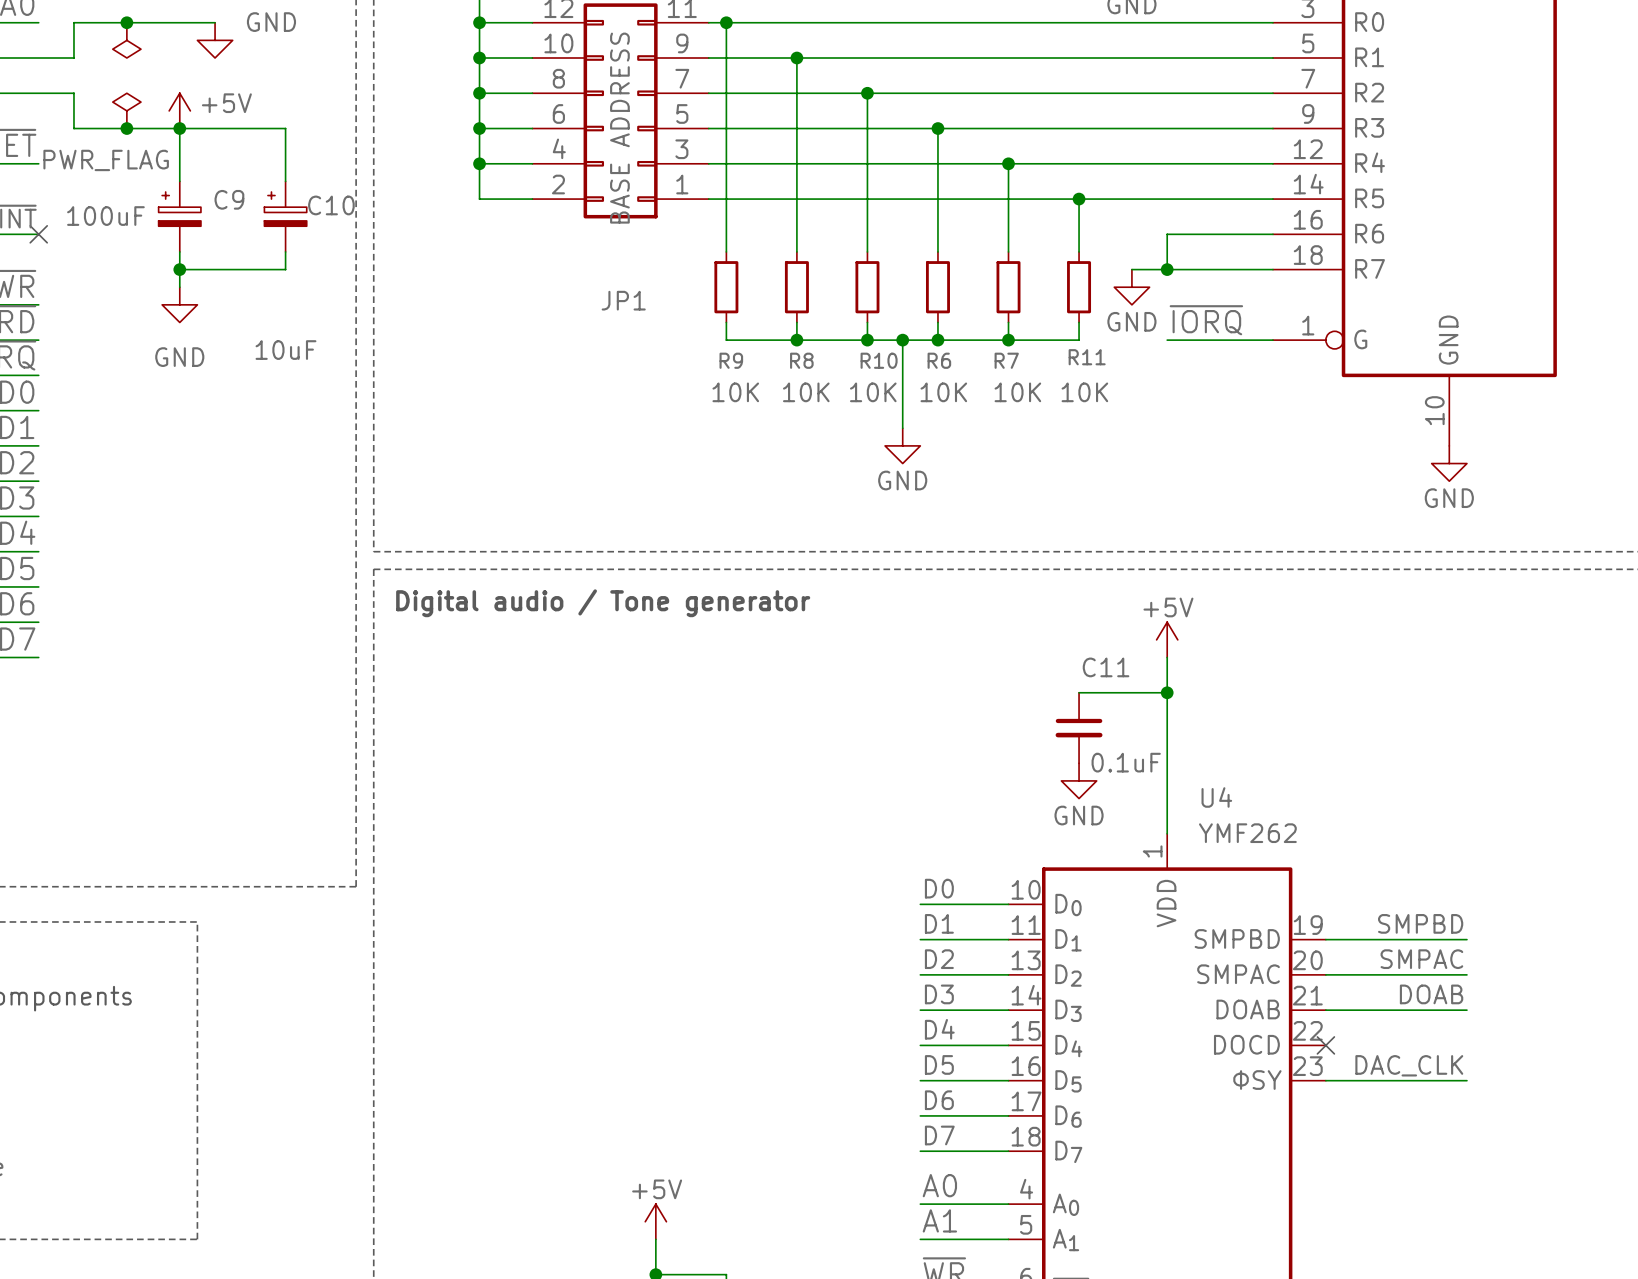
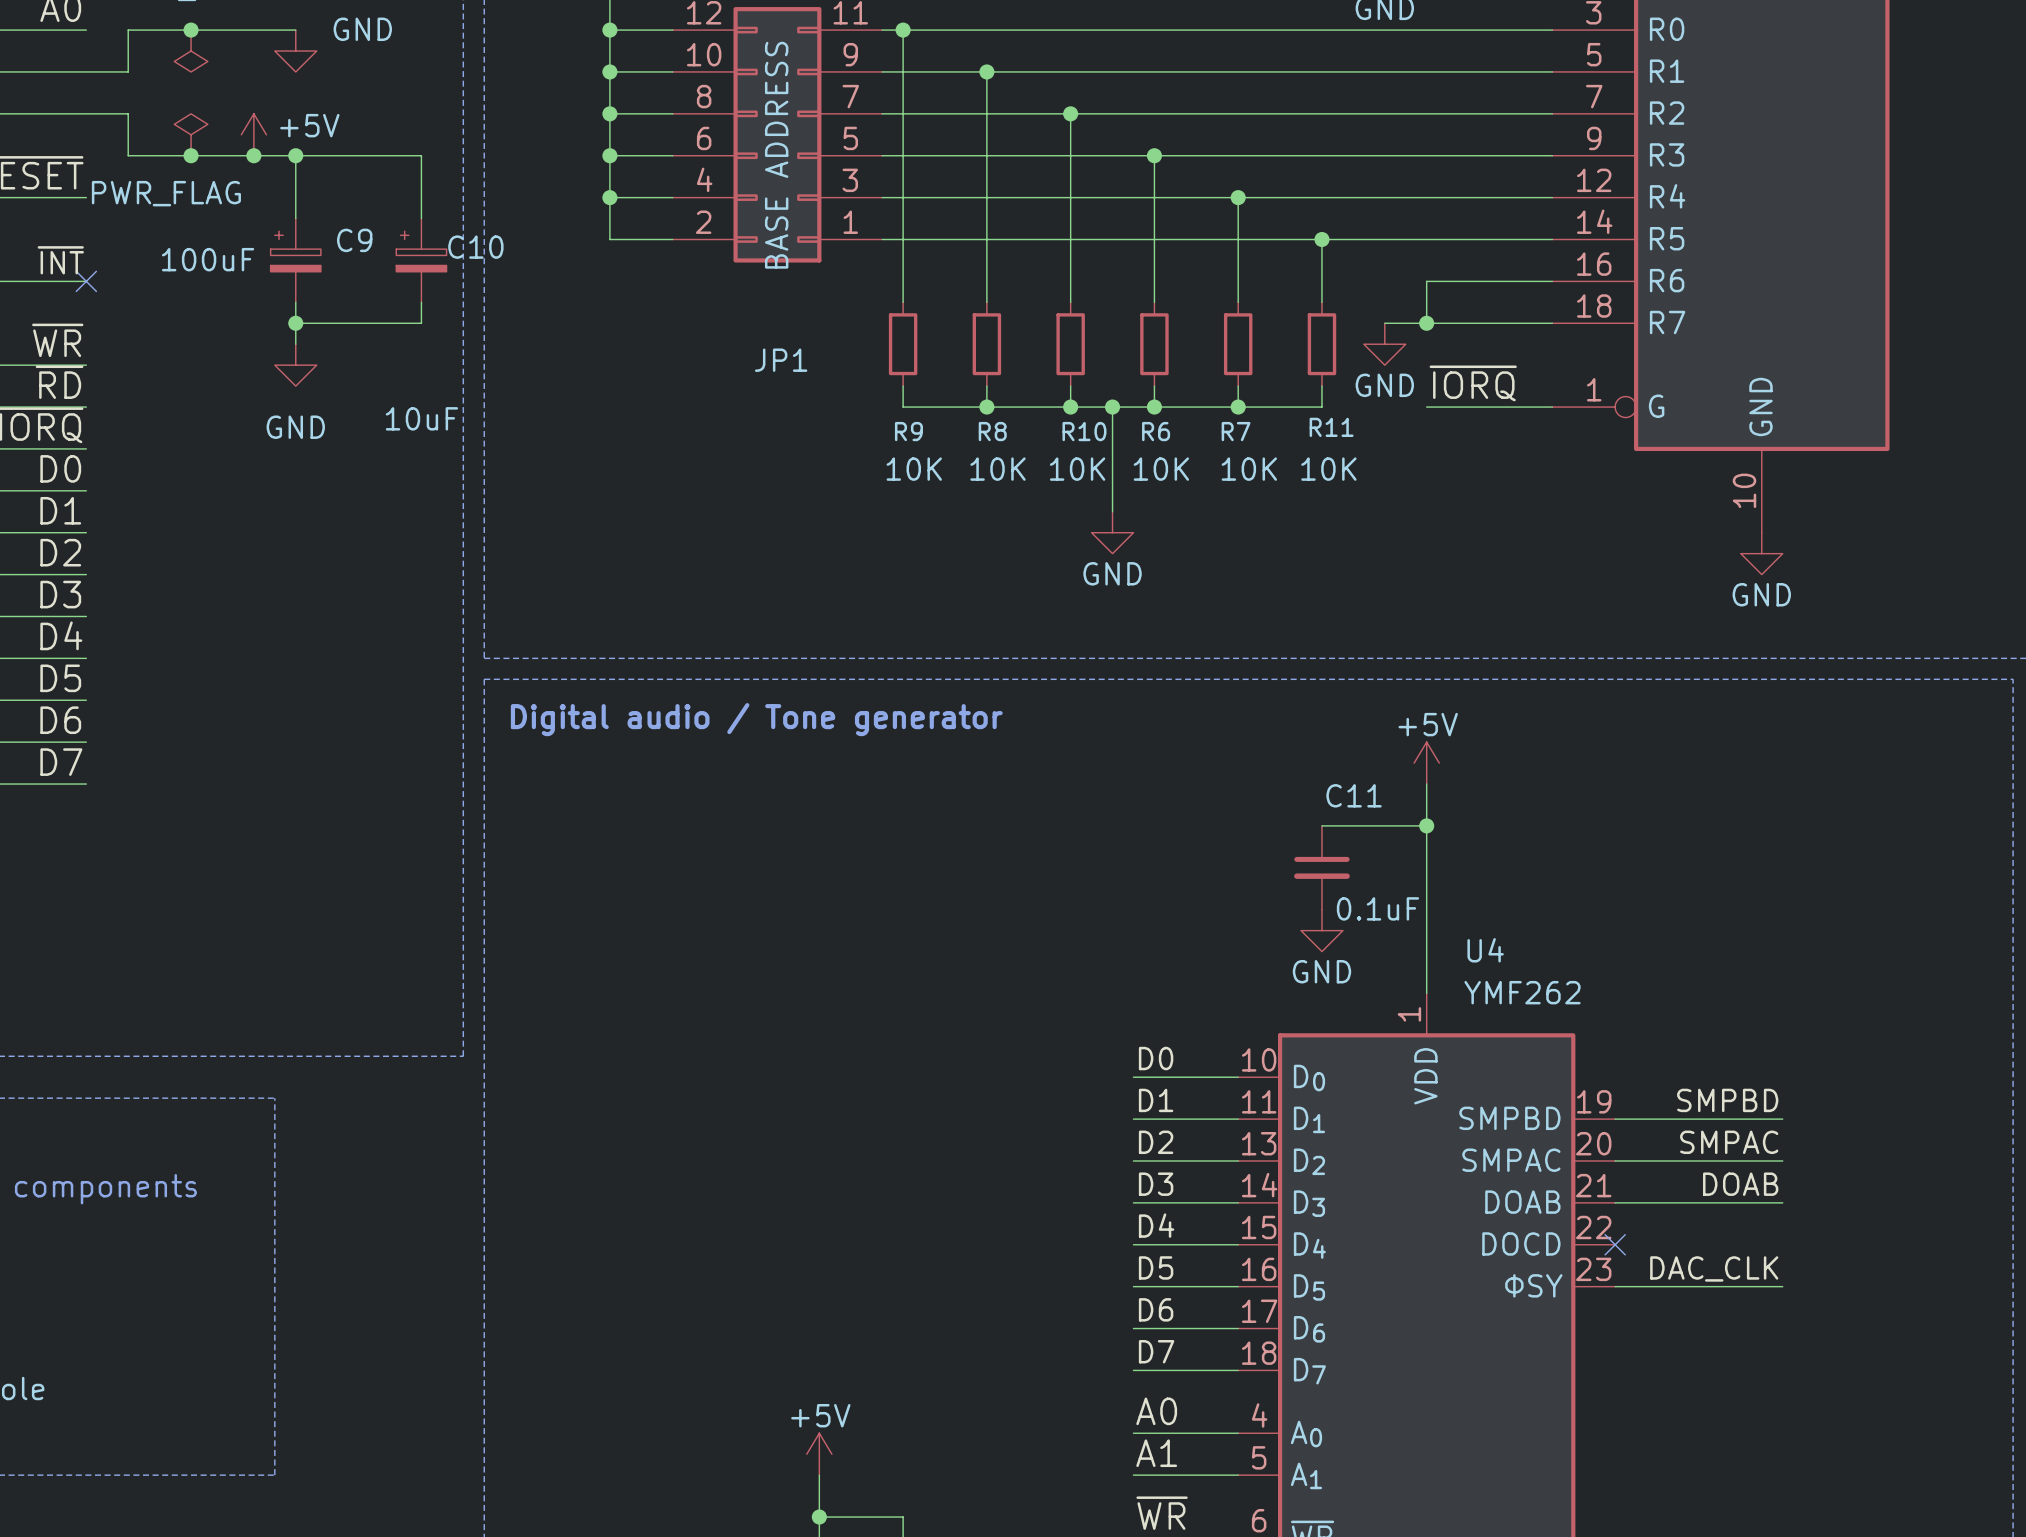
wire: (179, 128) (179, 181) -> (295, 155) (295, 218)
junction: none -> (295, 155)
wire: (285, 128) (285, 181) -> (379, 155) (421, 155) (421, 218)
C9 position: (179, 216) -> (295, 260)
C10 position: (285, 216) -> (421, 260)
wire: (179, 251) (179, 287) -> (295, 302) (295, 344)
wire: (285, 251) (285, 269) -> (421, 302) (421, 323) (379, 323)
wire: (179, 269) (215, 269) -> none
junction position: (179, 269) -> (295, 323)
power symbol position: GND (179, 304) -> GND (295, 365)

